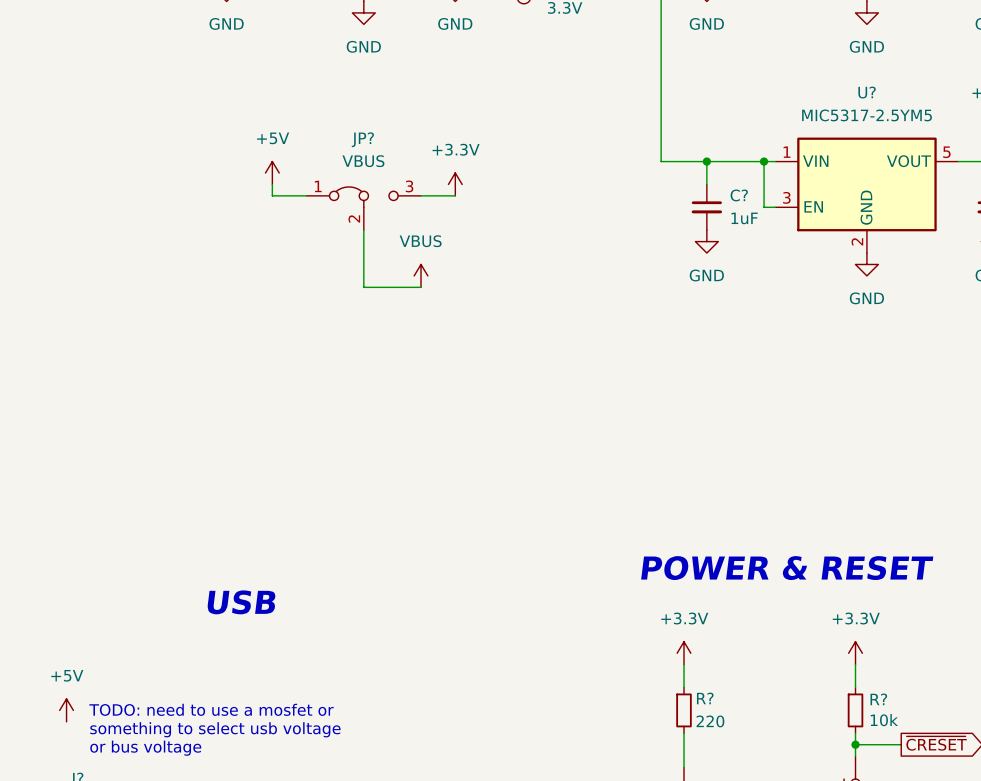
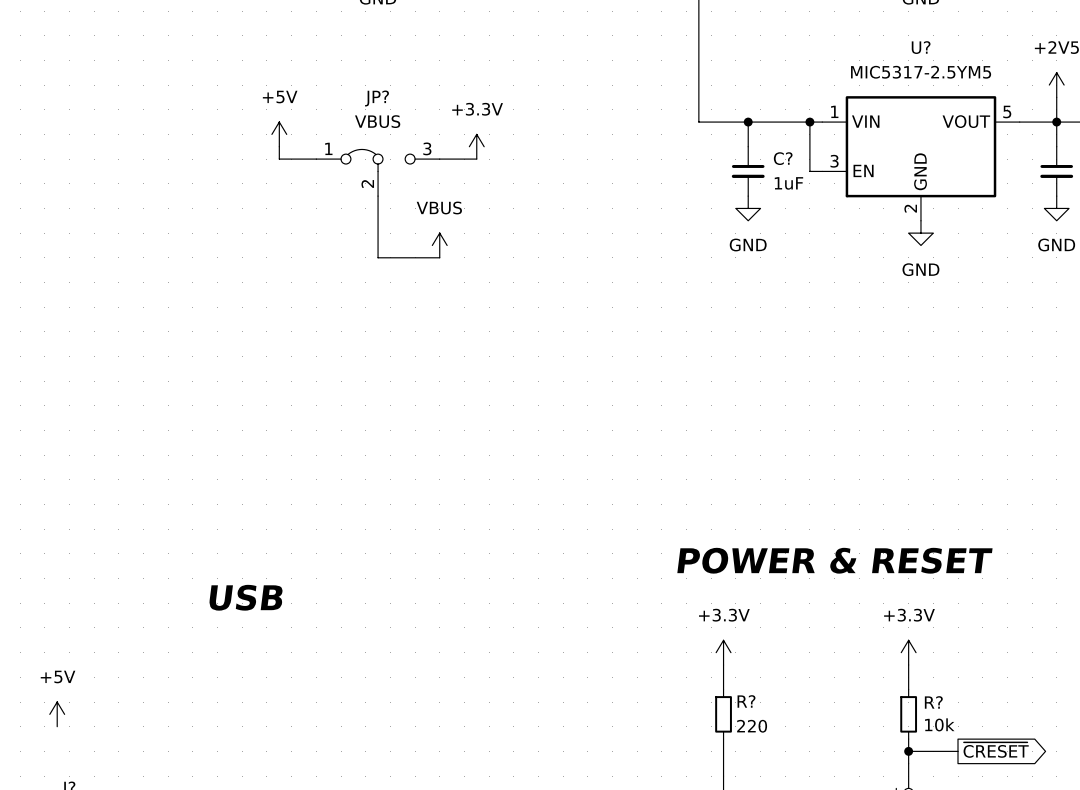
text: TODO: need to use a mosfet or (211, 709) -> none
text: something to select usb voltage (215, 729) -> none
text: or bus voltage (145, 748) -> none

